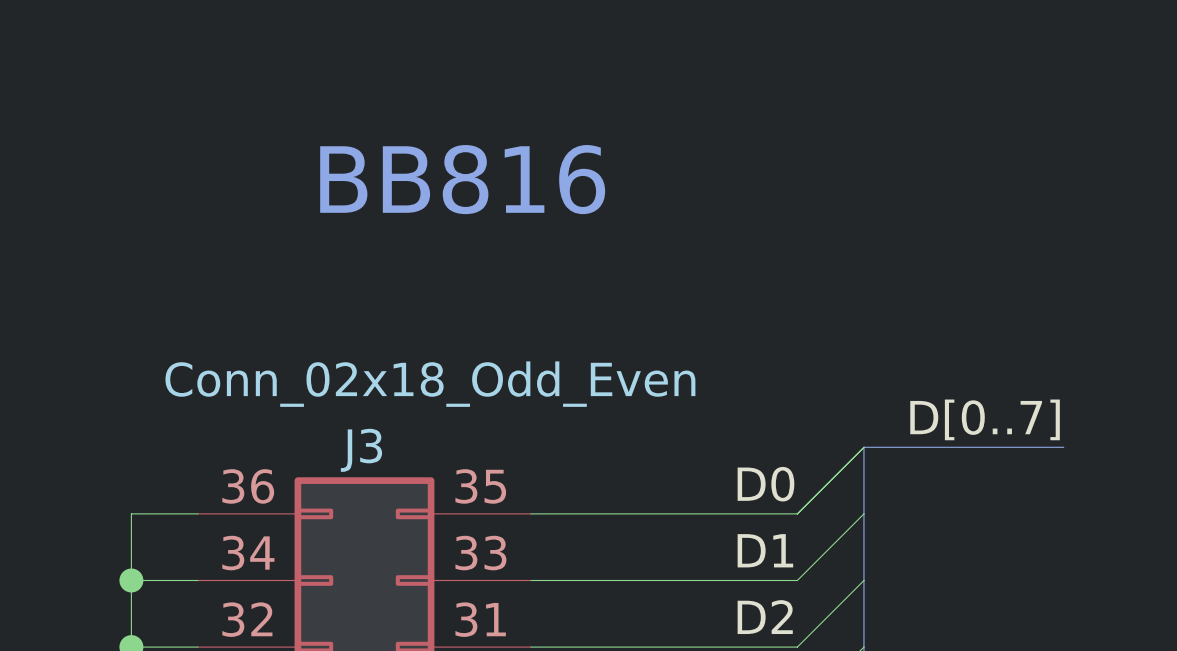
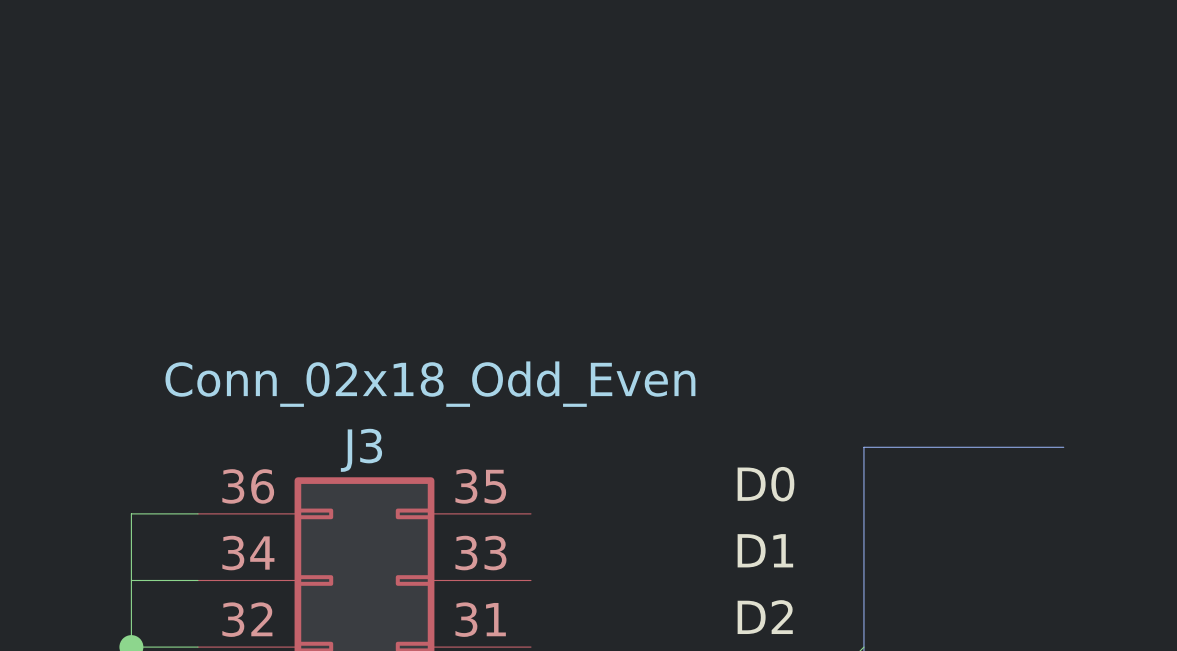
text: BB816 (462, 179) -> none
label: D[0..7] (985, 419) -> none
wire: (863, 447) (797, 513) (530, 513) -> none
wire: (863, 513) (797, 580) (530, 580) -> none
junction: (131, 580) -> none
wire: (863, 580) (797, 647) (530, 647) -> none

